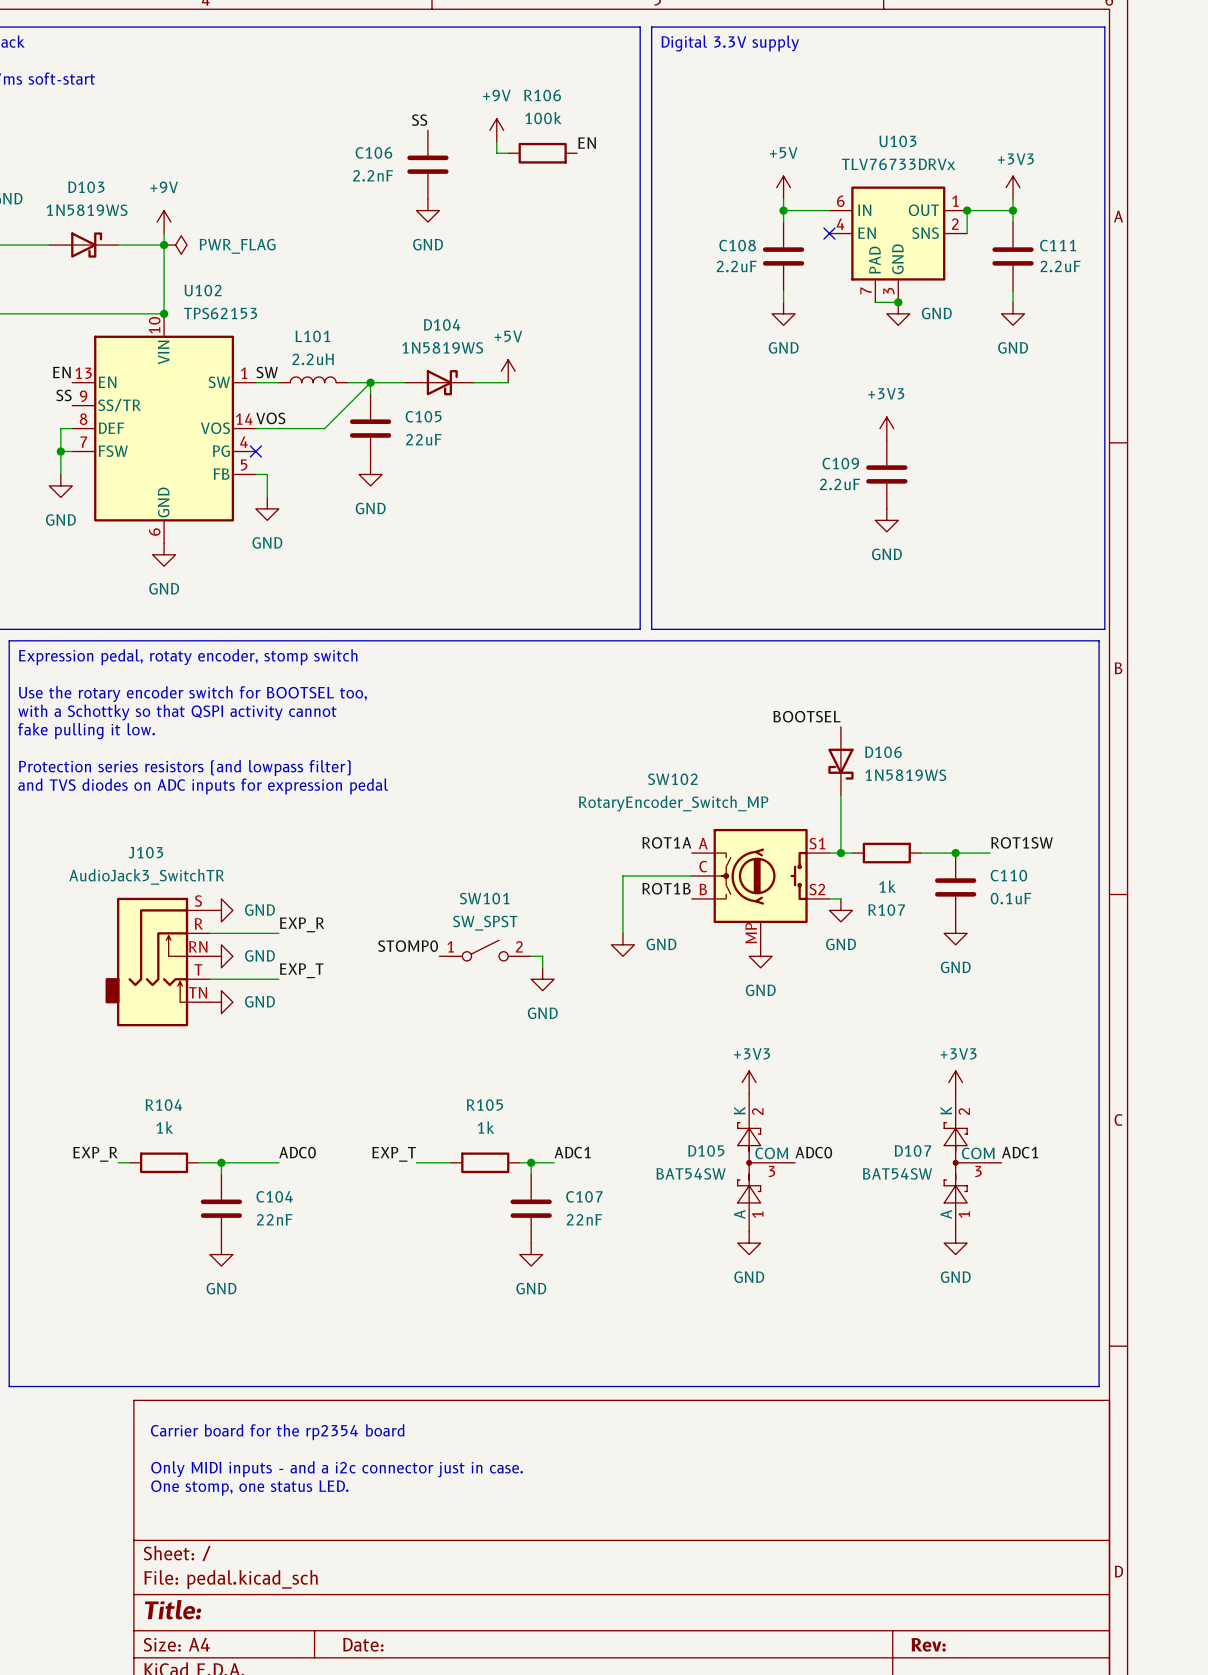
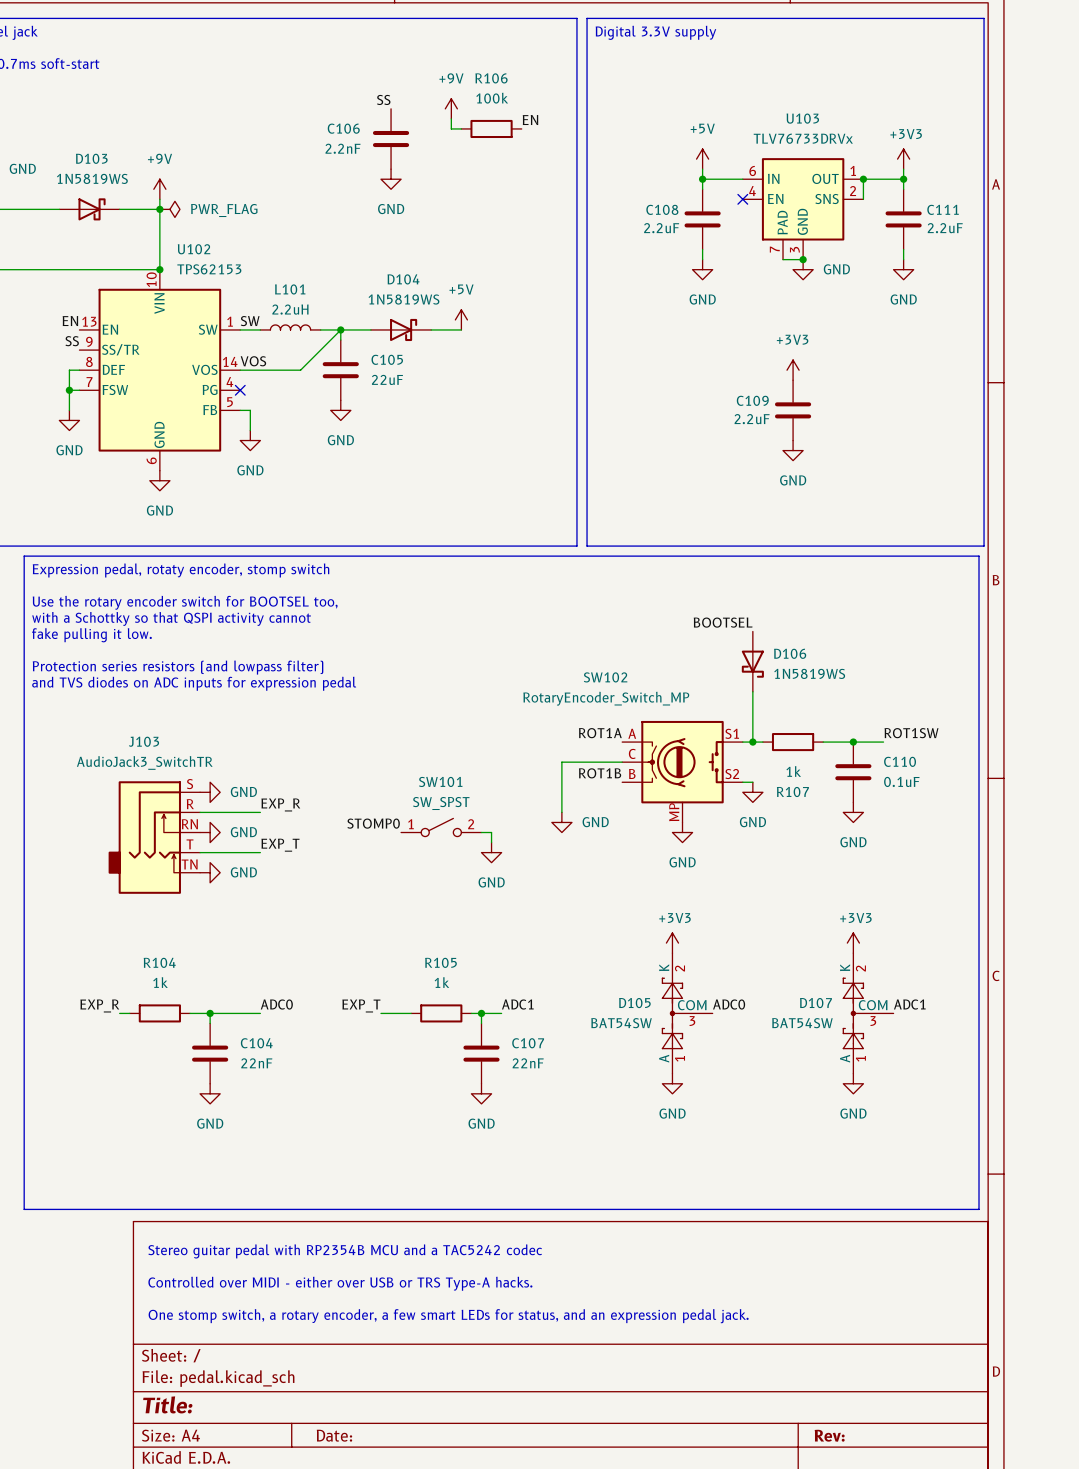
text: Carrier board for the rp2354 board (277, 1432) -> Stereo guitar pedal with RP2354B MCU and a TAC5242 codec (345, 1251)
text: Only MIDI inputs - and a i2c connector just in case. (337, 1469) -> Controlled over MIDI - either over USB or TRS Type-A hacks. (340, 1283)
text: One stomp, one status LED. (249, 1487) -> none
text: none -> One stomp switch, a rotary encoder, a few smart LEDs for status, and an expression pedal jack. (448, 1316)

